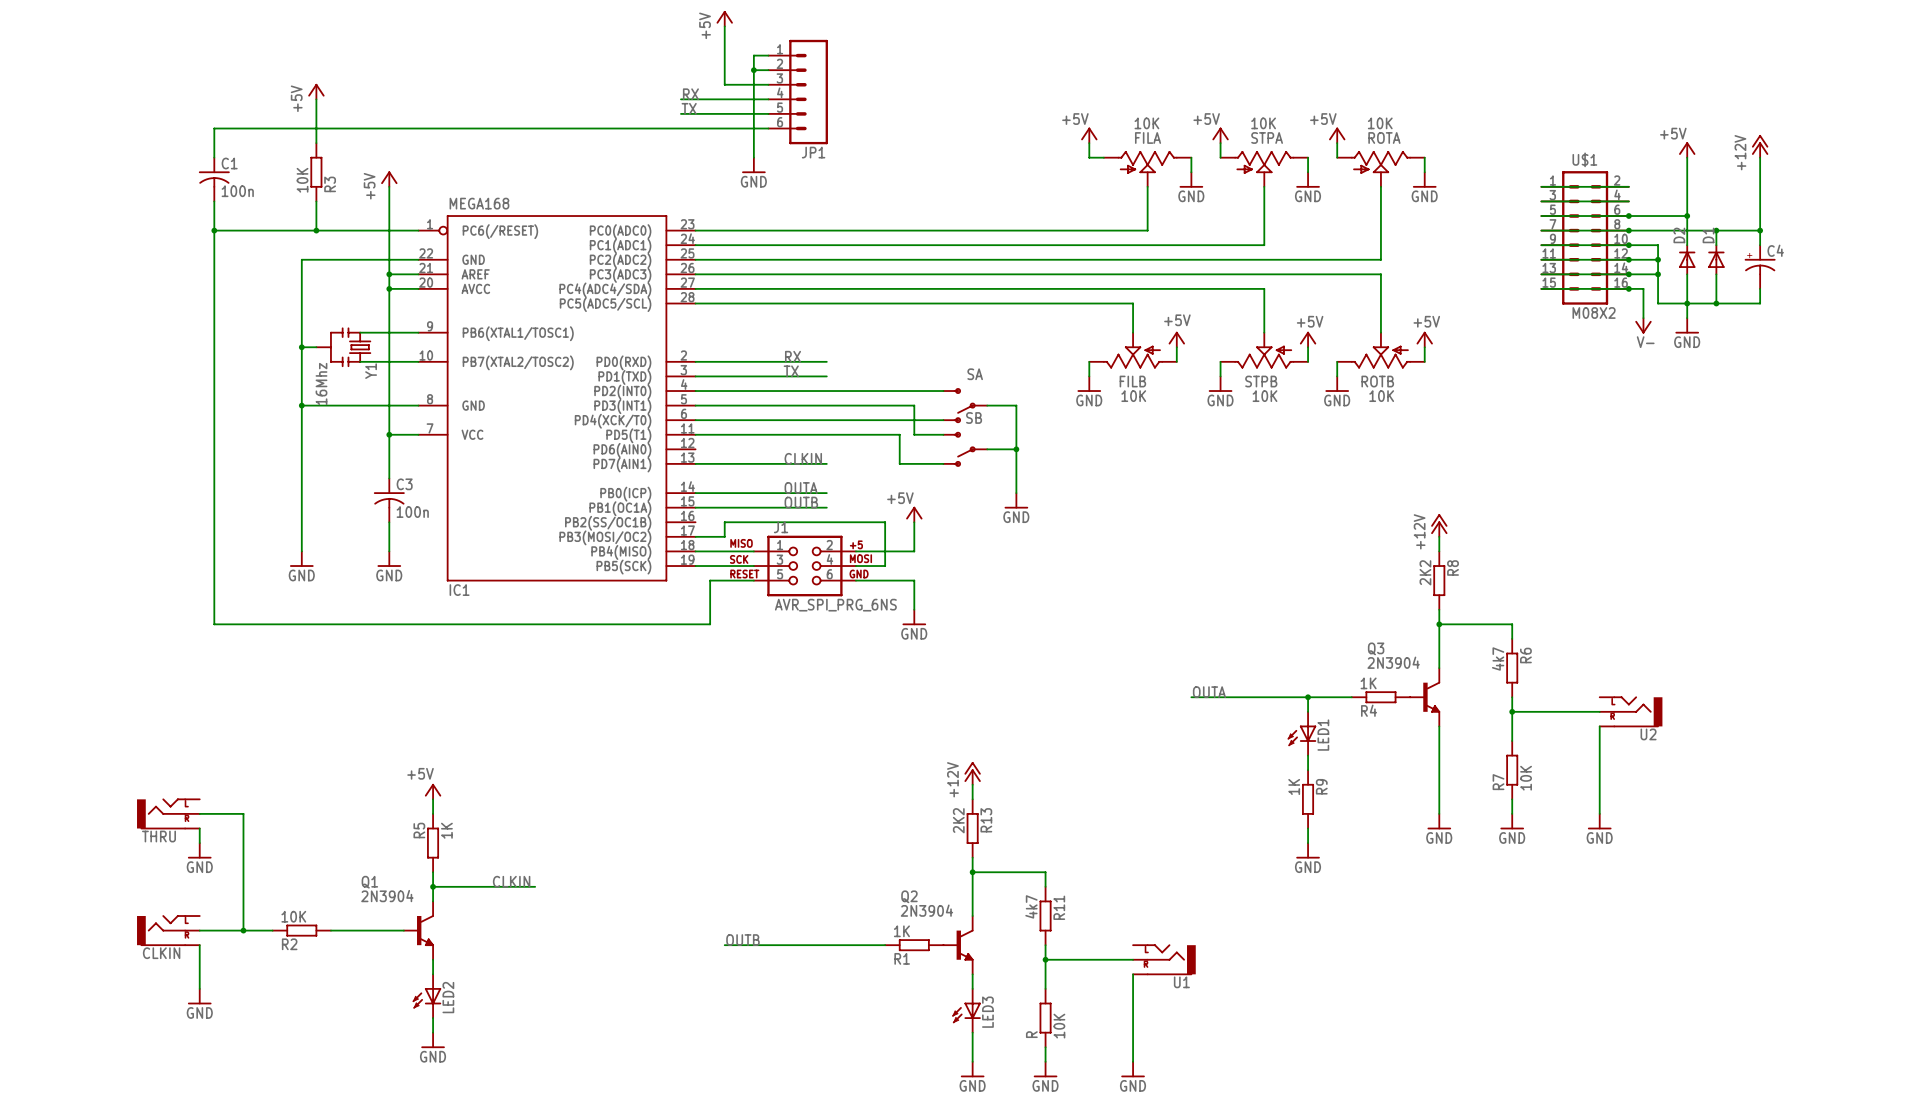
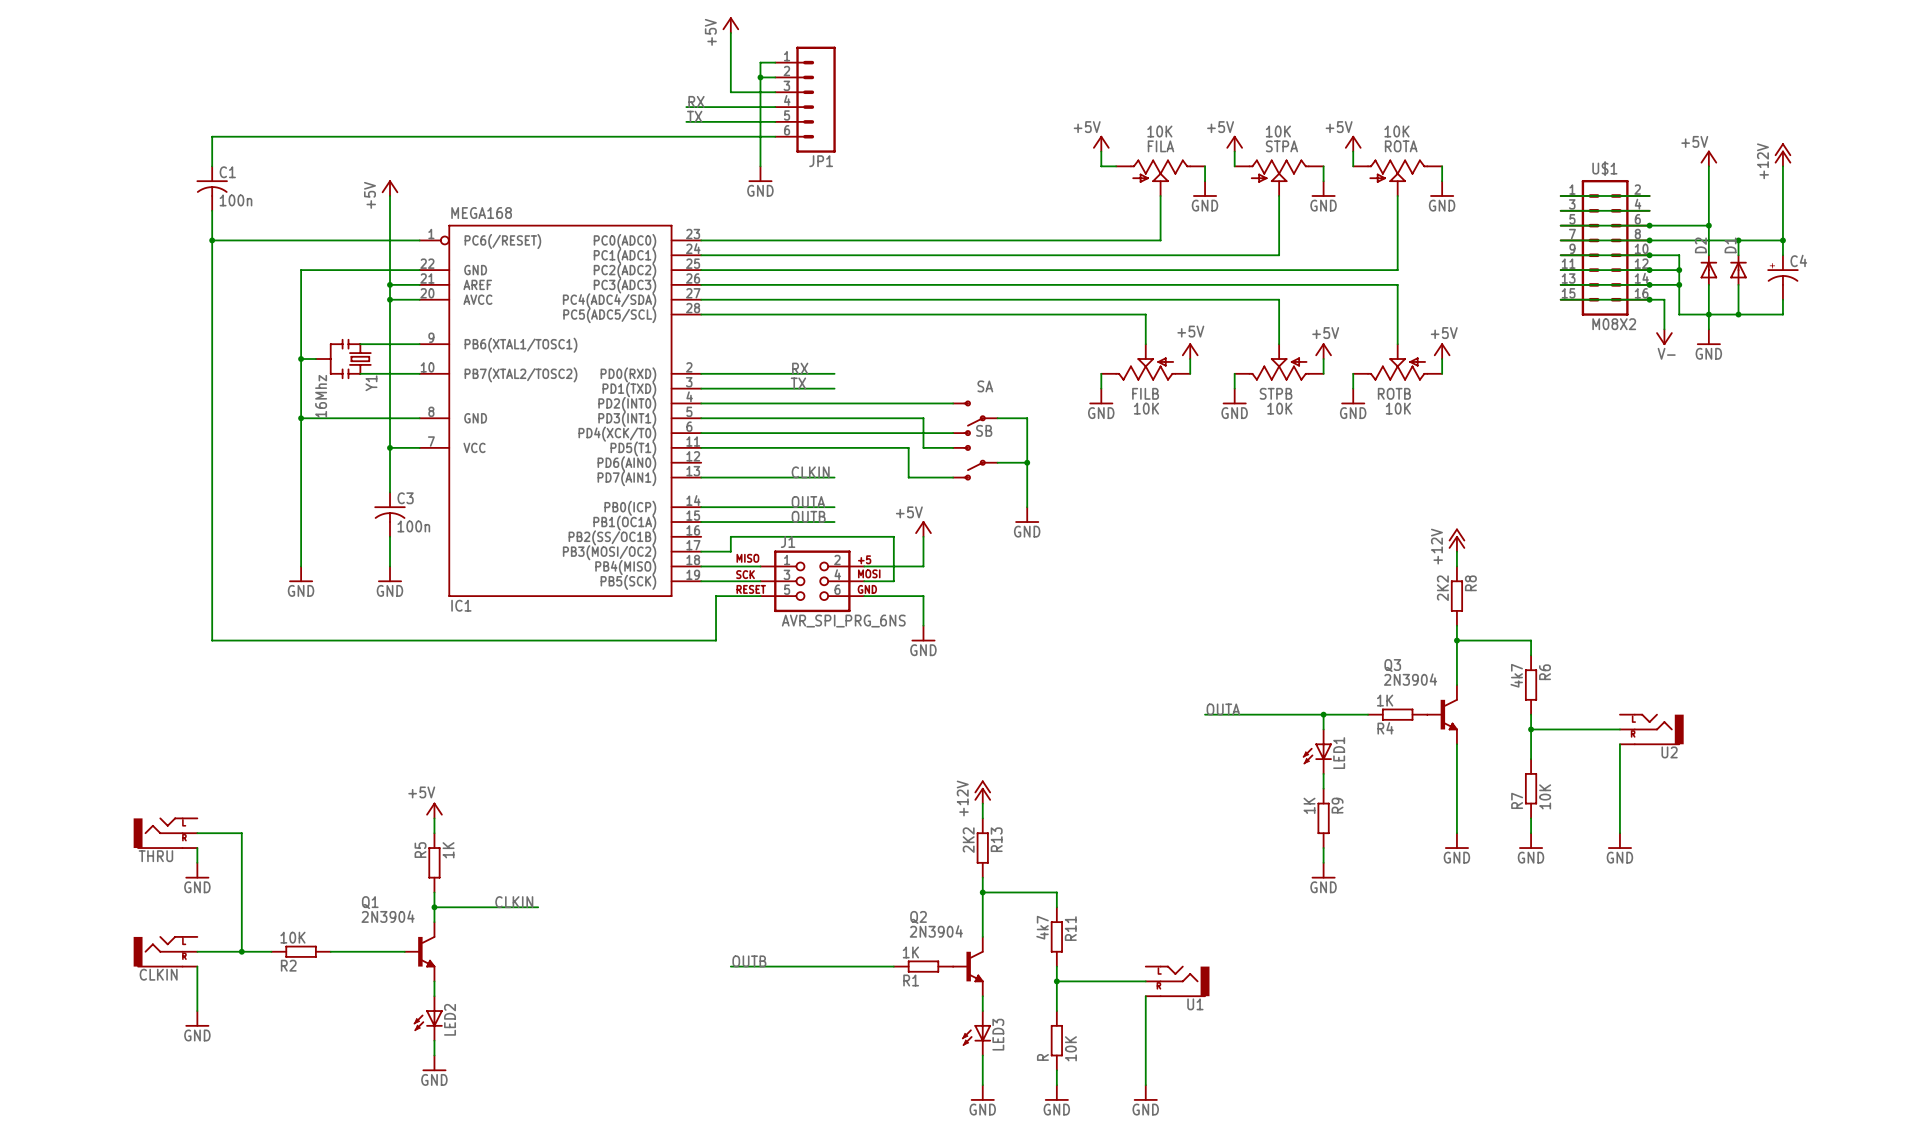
power symbol: +5V (316, 91) -> none
wire: (316, 99) (316, 143) -> none
R3: 10K (316, 172) -> none
wire: (316, 201) (316, 230) -> none
junction: (316, 230) -> none

